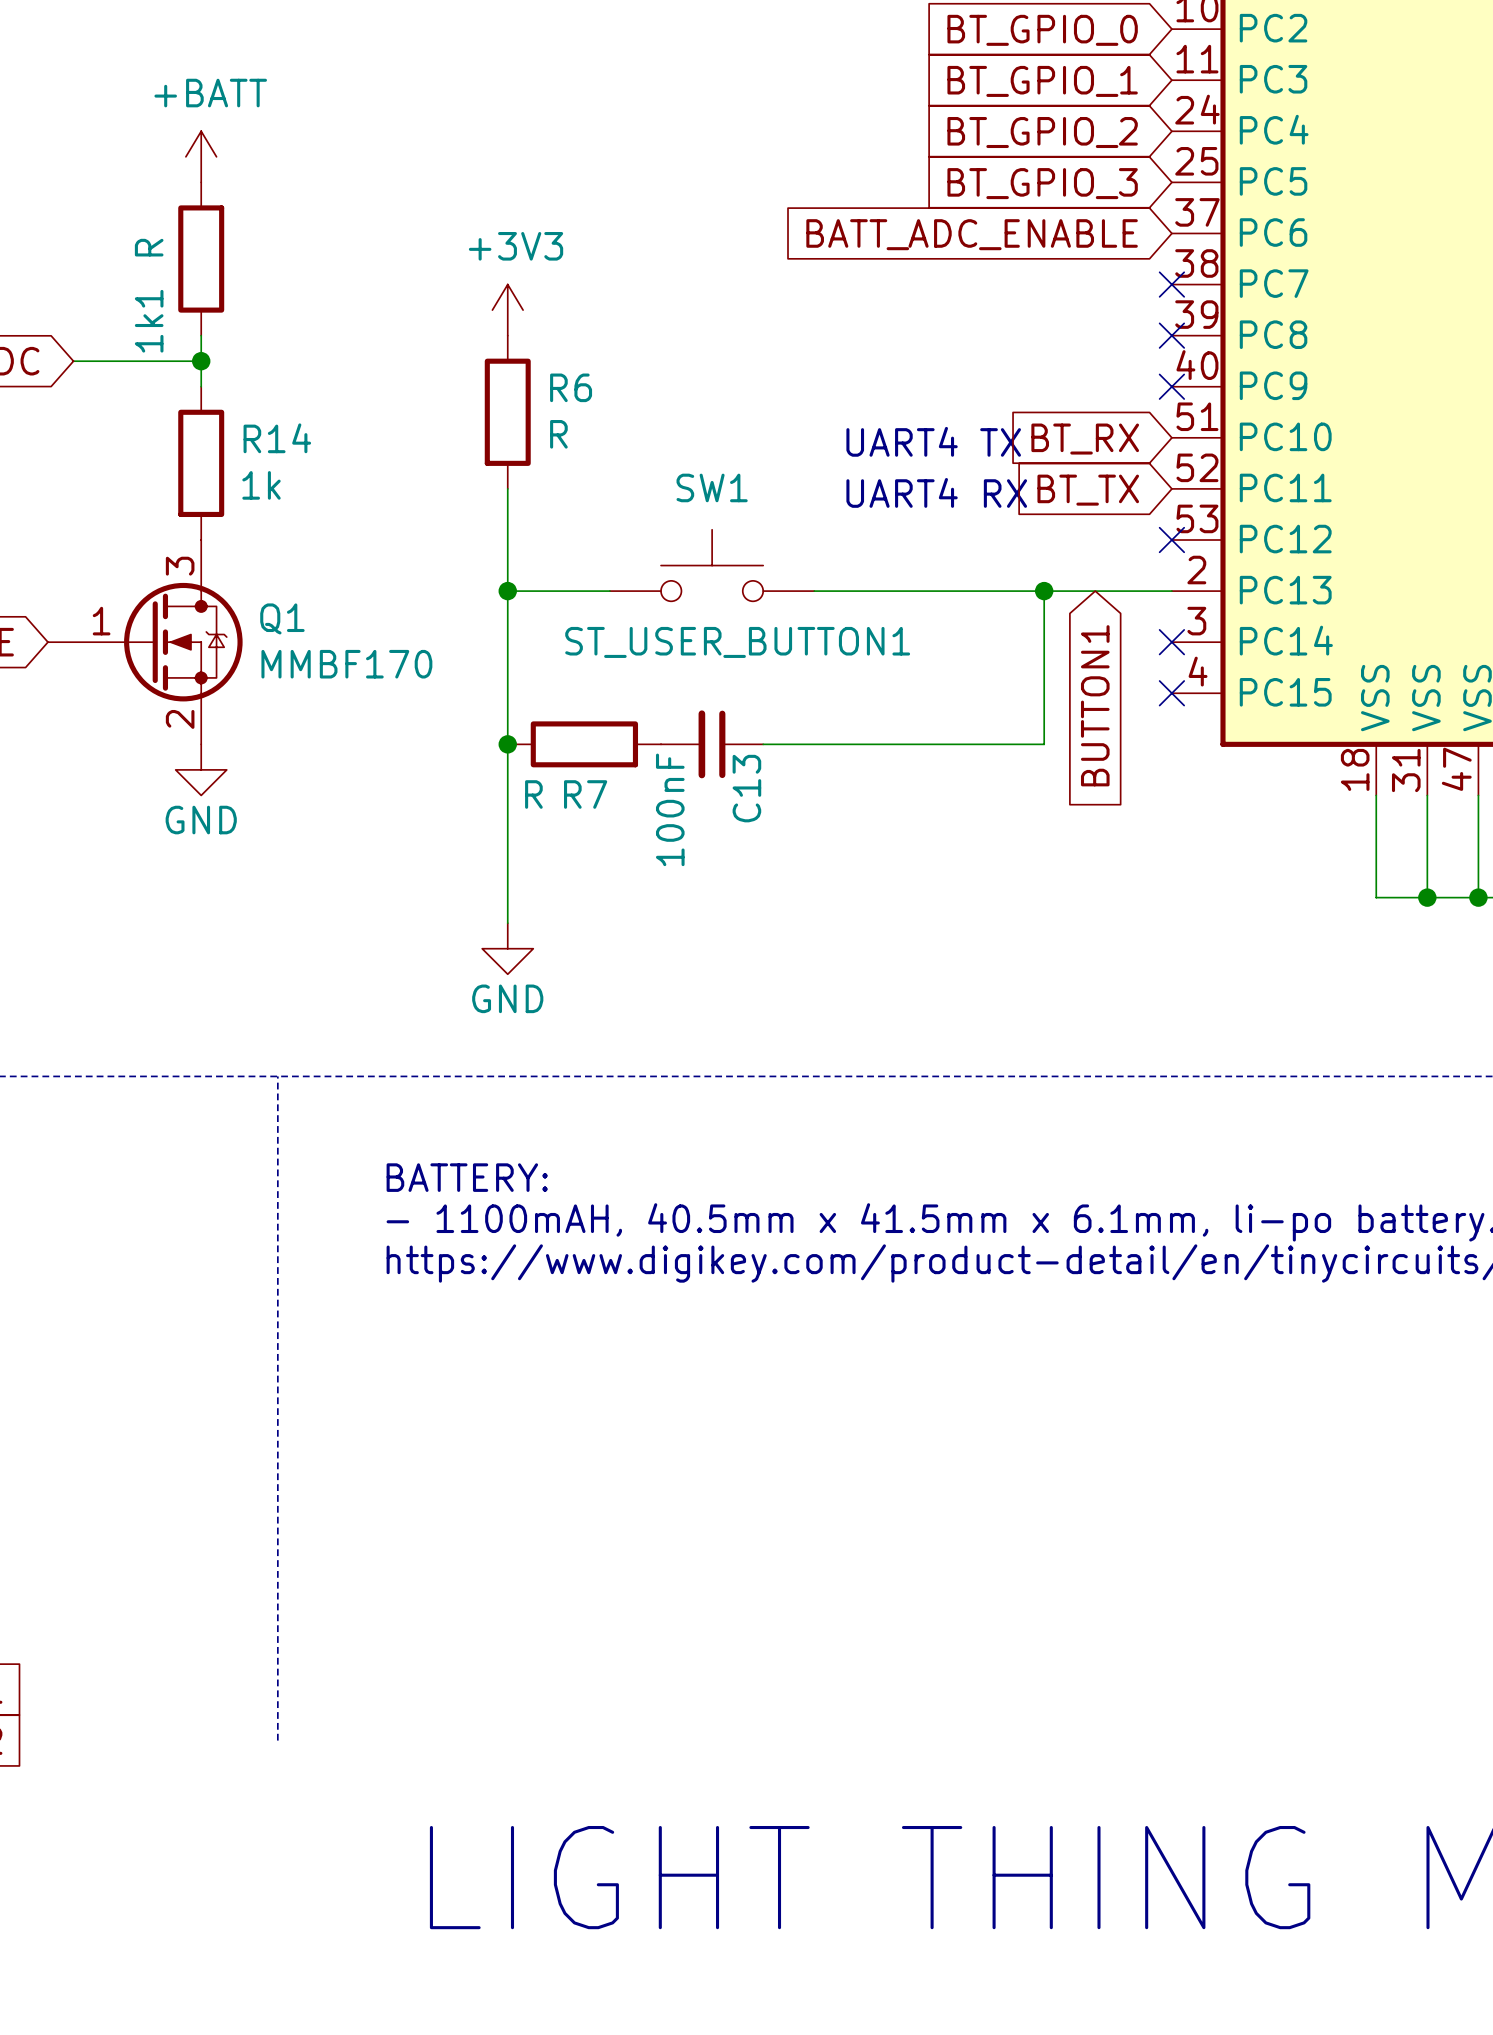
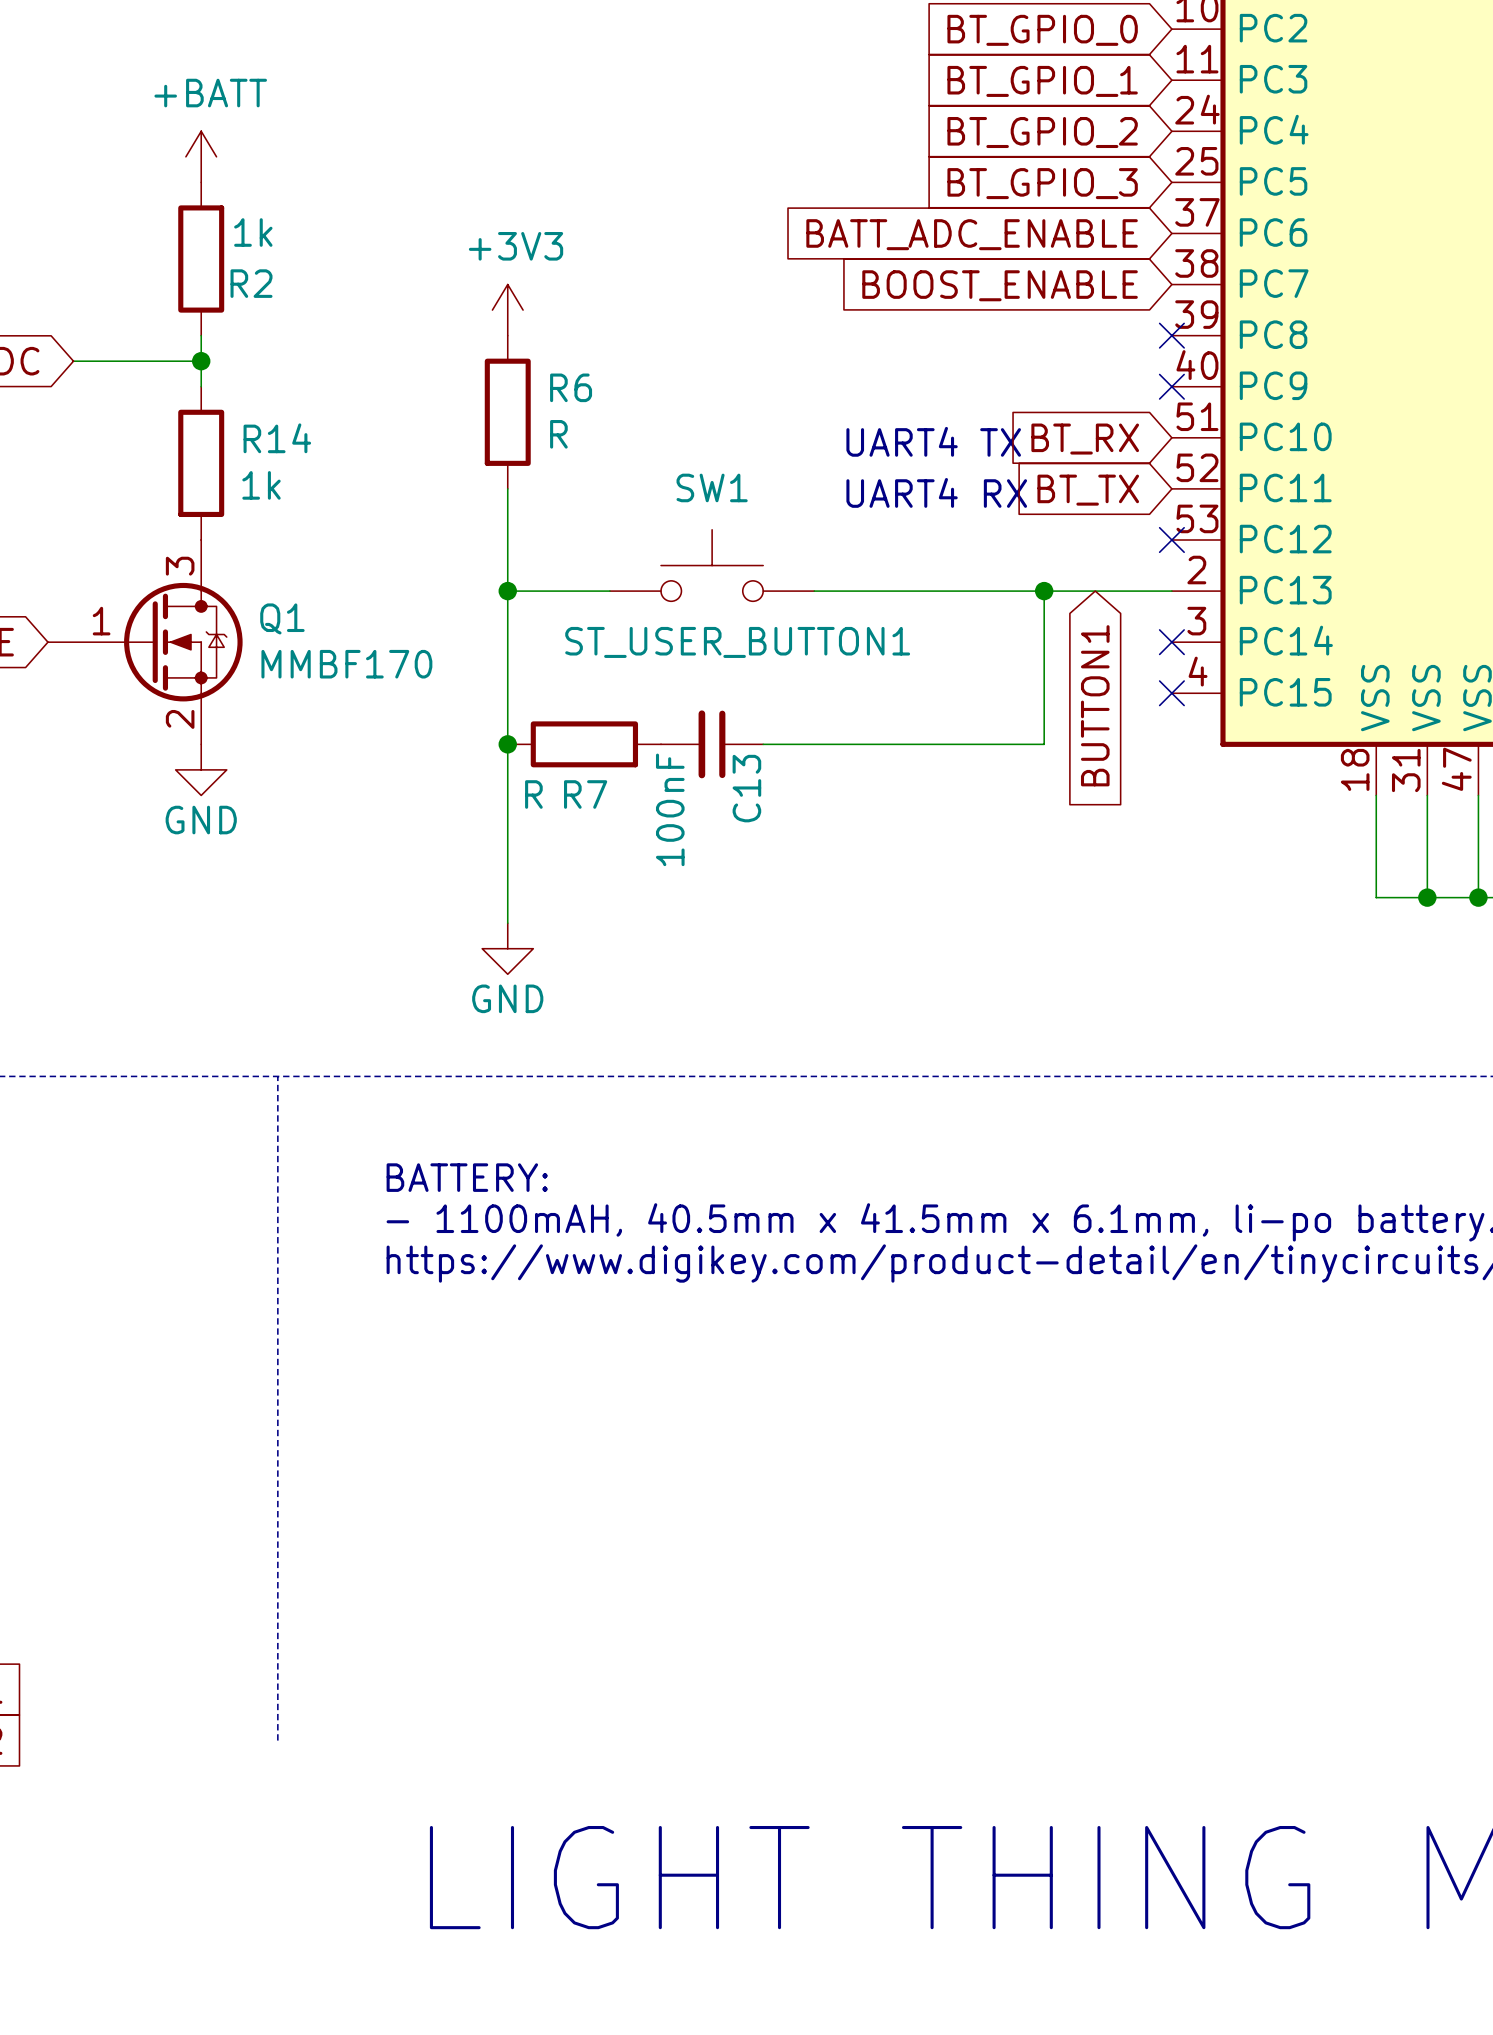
1k1 value: R (149, 247) -> 1k (253, 232)
no-connect mark: (1171, 284) -> none
global label: none -> BOOST_ENABLE (1000, 285)
1k1 name: 1k1 (149, 321) -> R2 (251, 283)

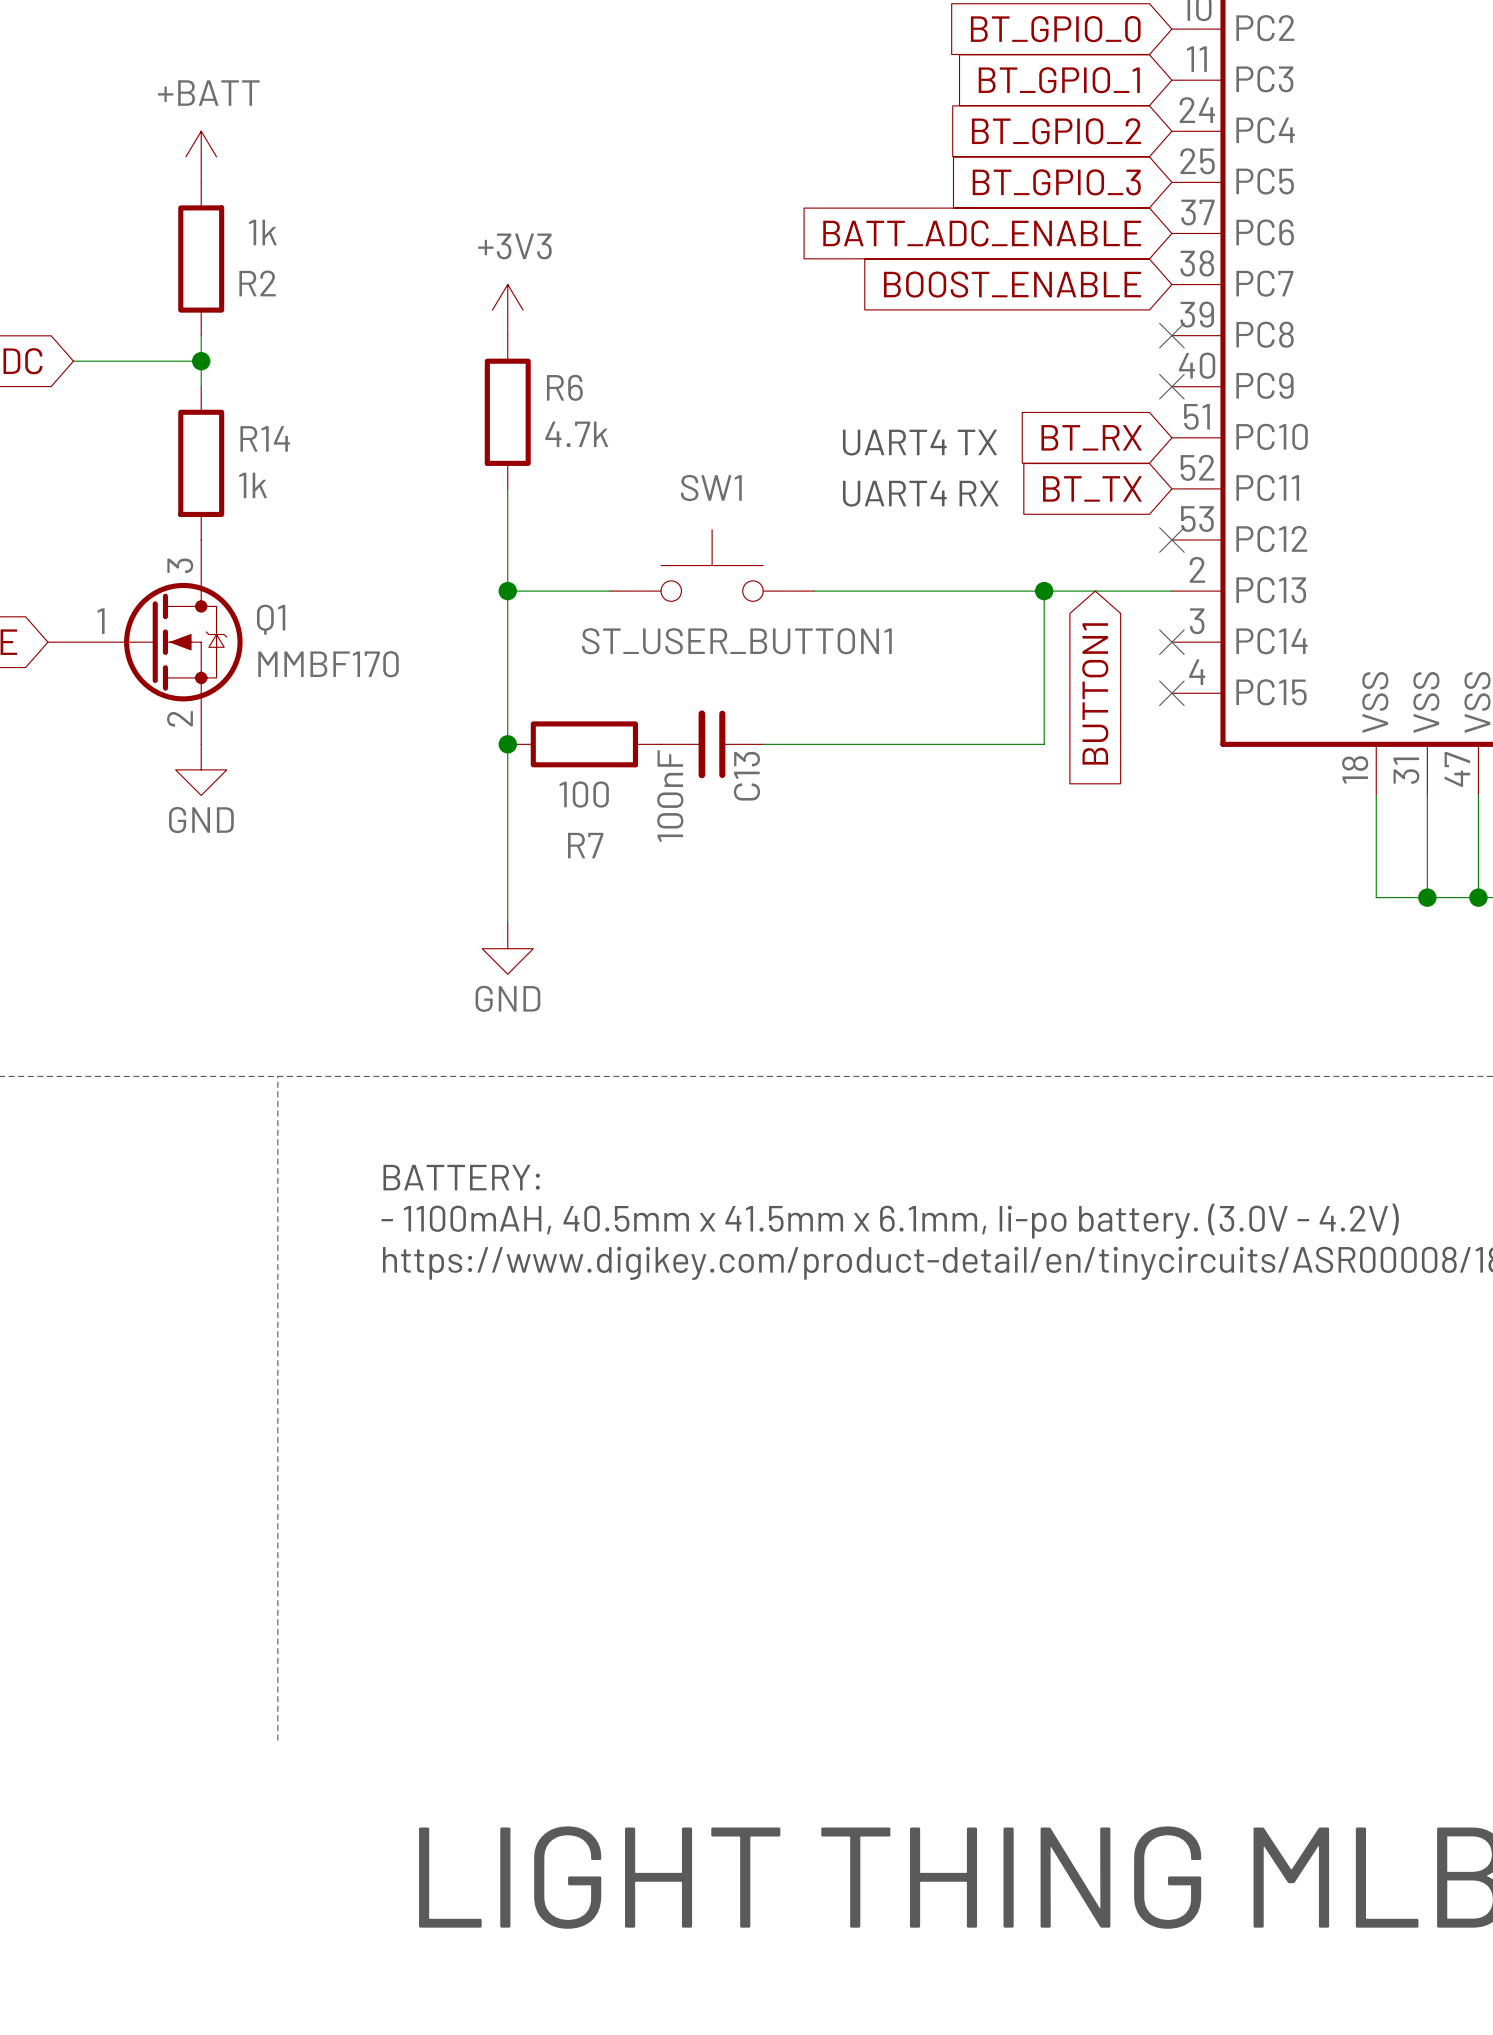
R6 value: R (558, 434) -> 4.7k (576, 434)
R7 value: R (533, 794) -> 100 (584, 794)
R7 name position: R7 (585, 794) -> R7 (585, 845)

